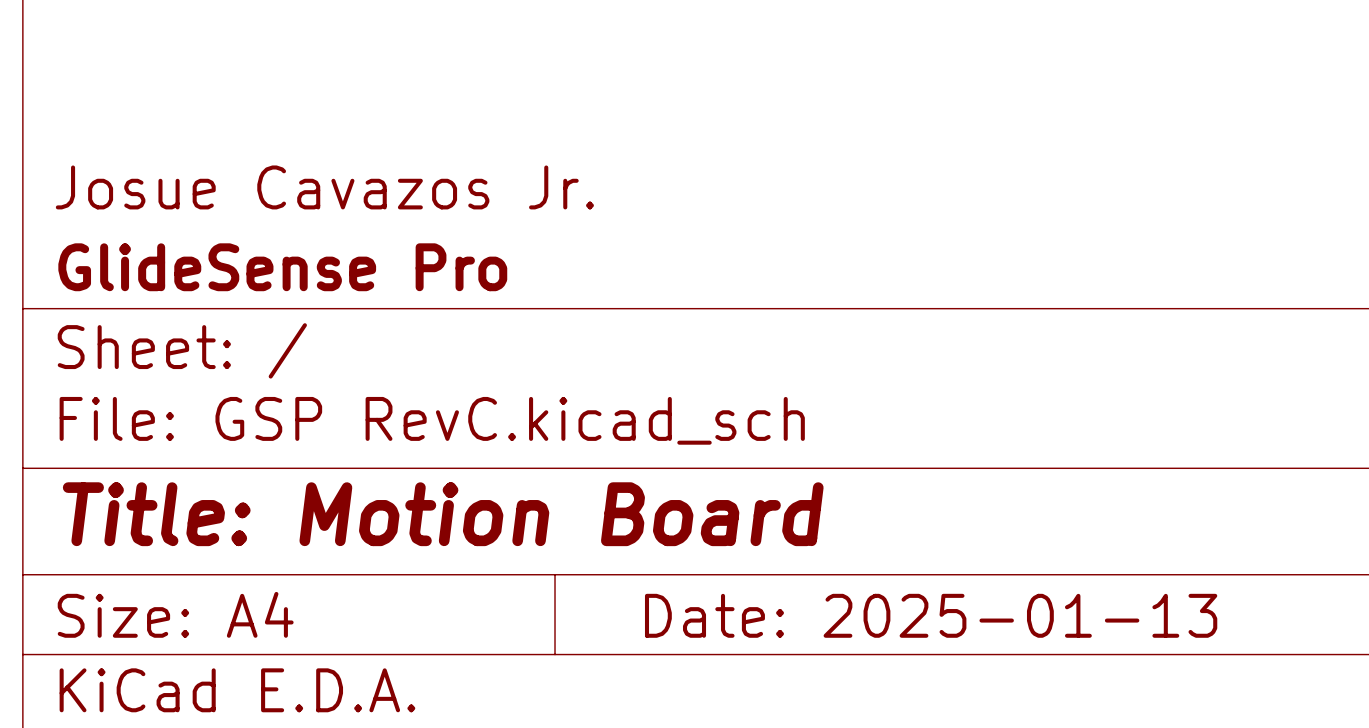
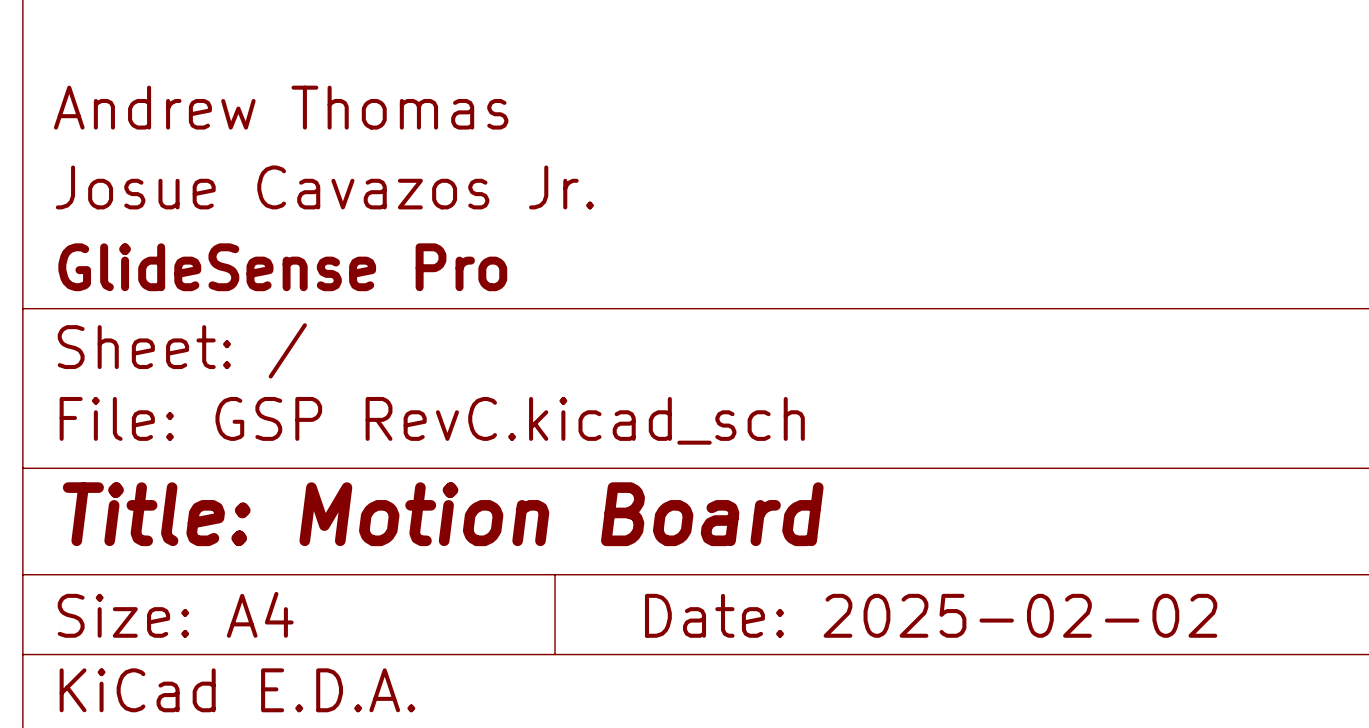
title block: none -> Andrew Thomas (281, 107)
title block: Date: 2025-01-13 (931, 615) -> Date: 2025-02-02 (931, 615)

